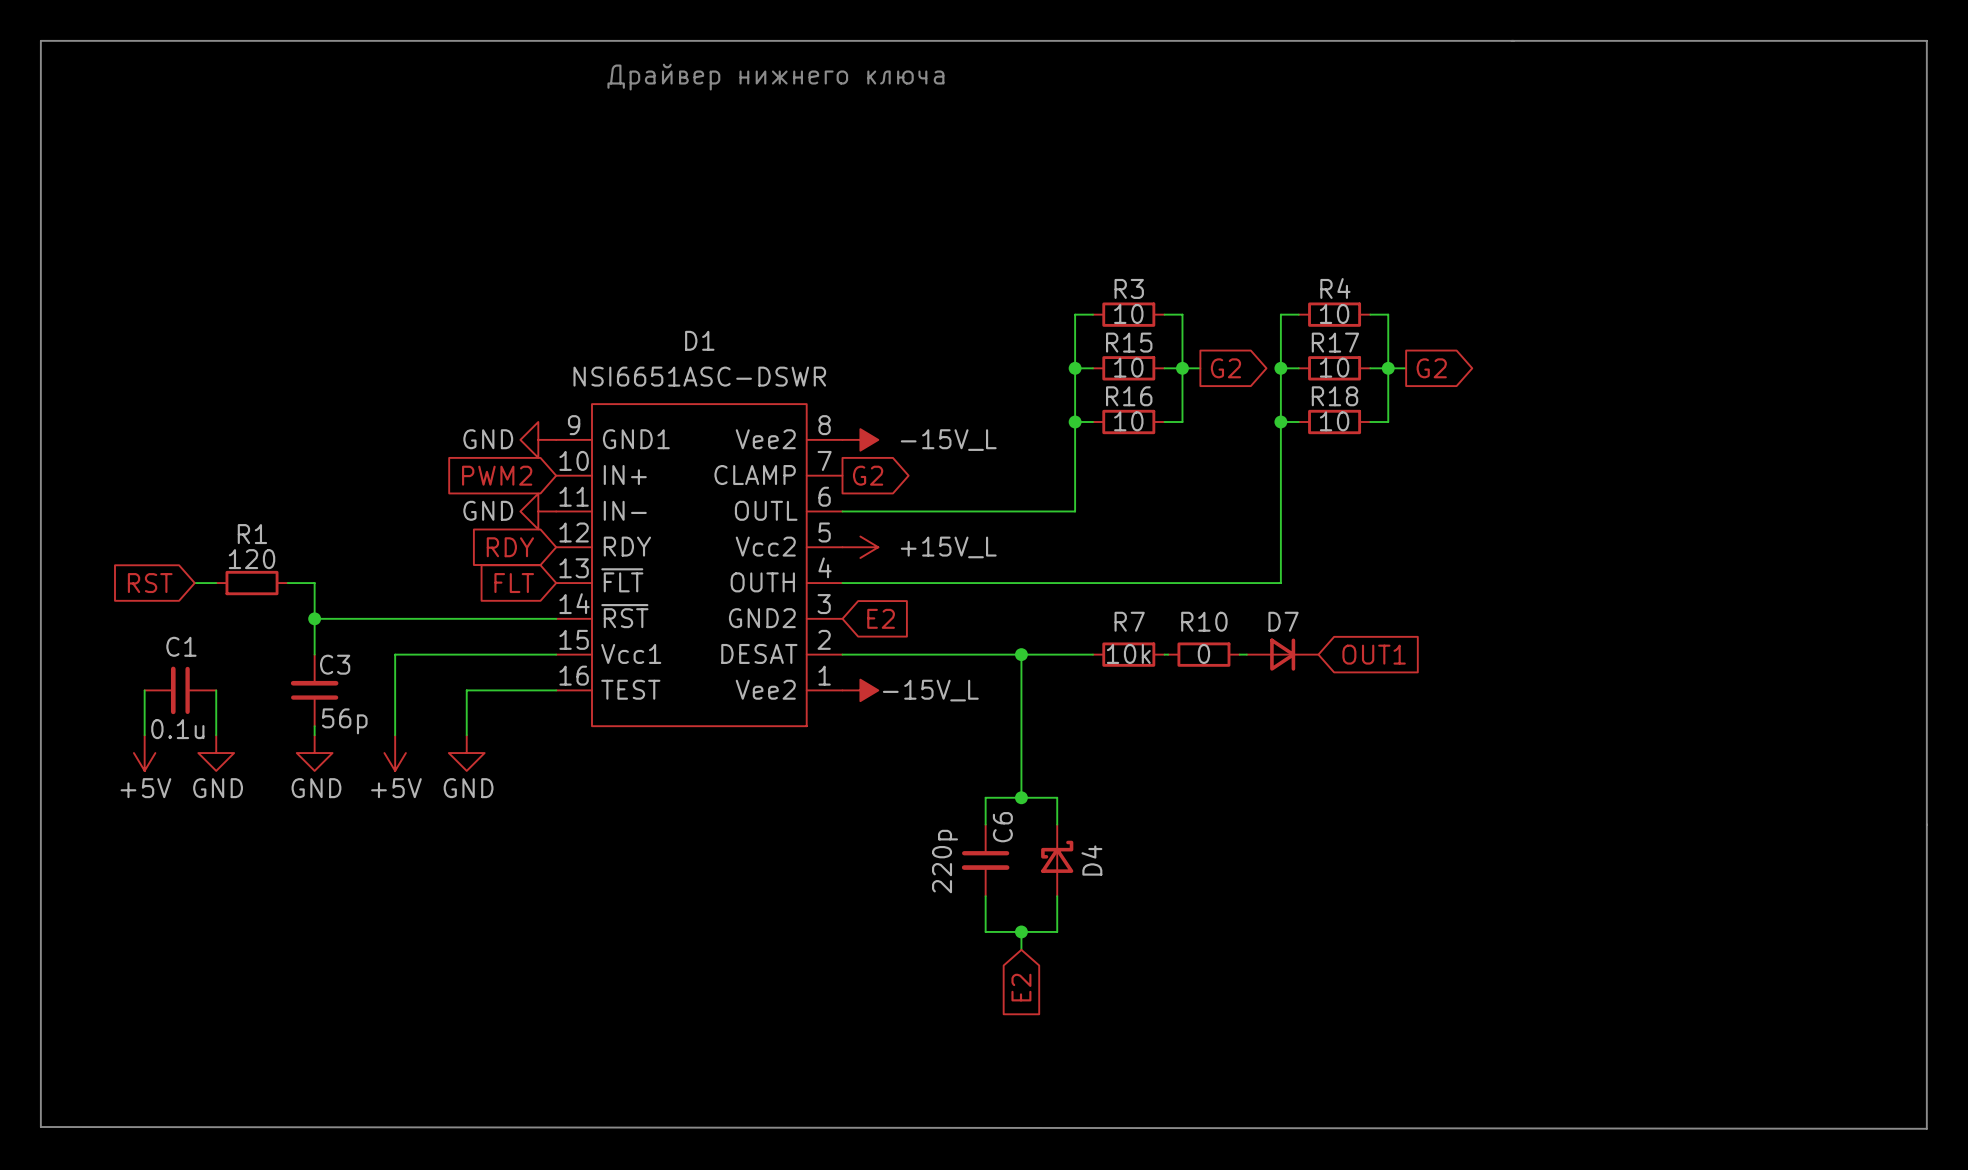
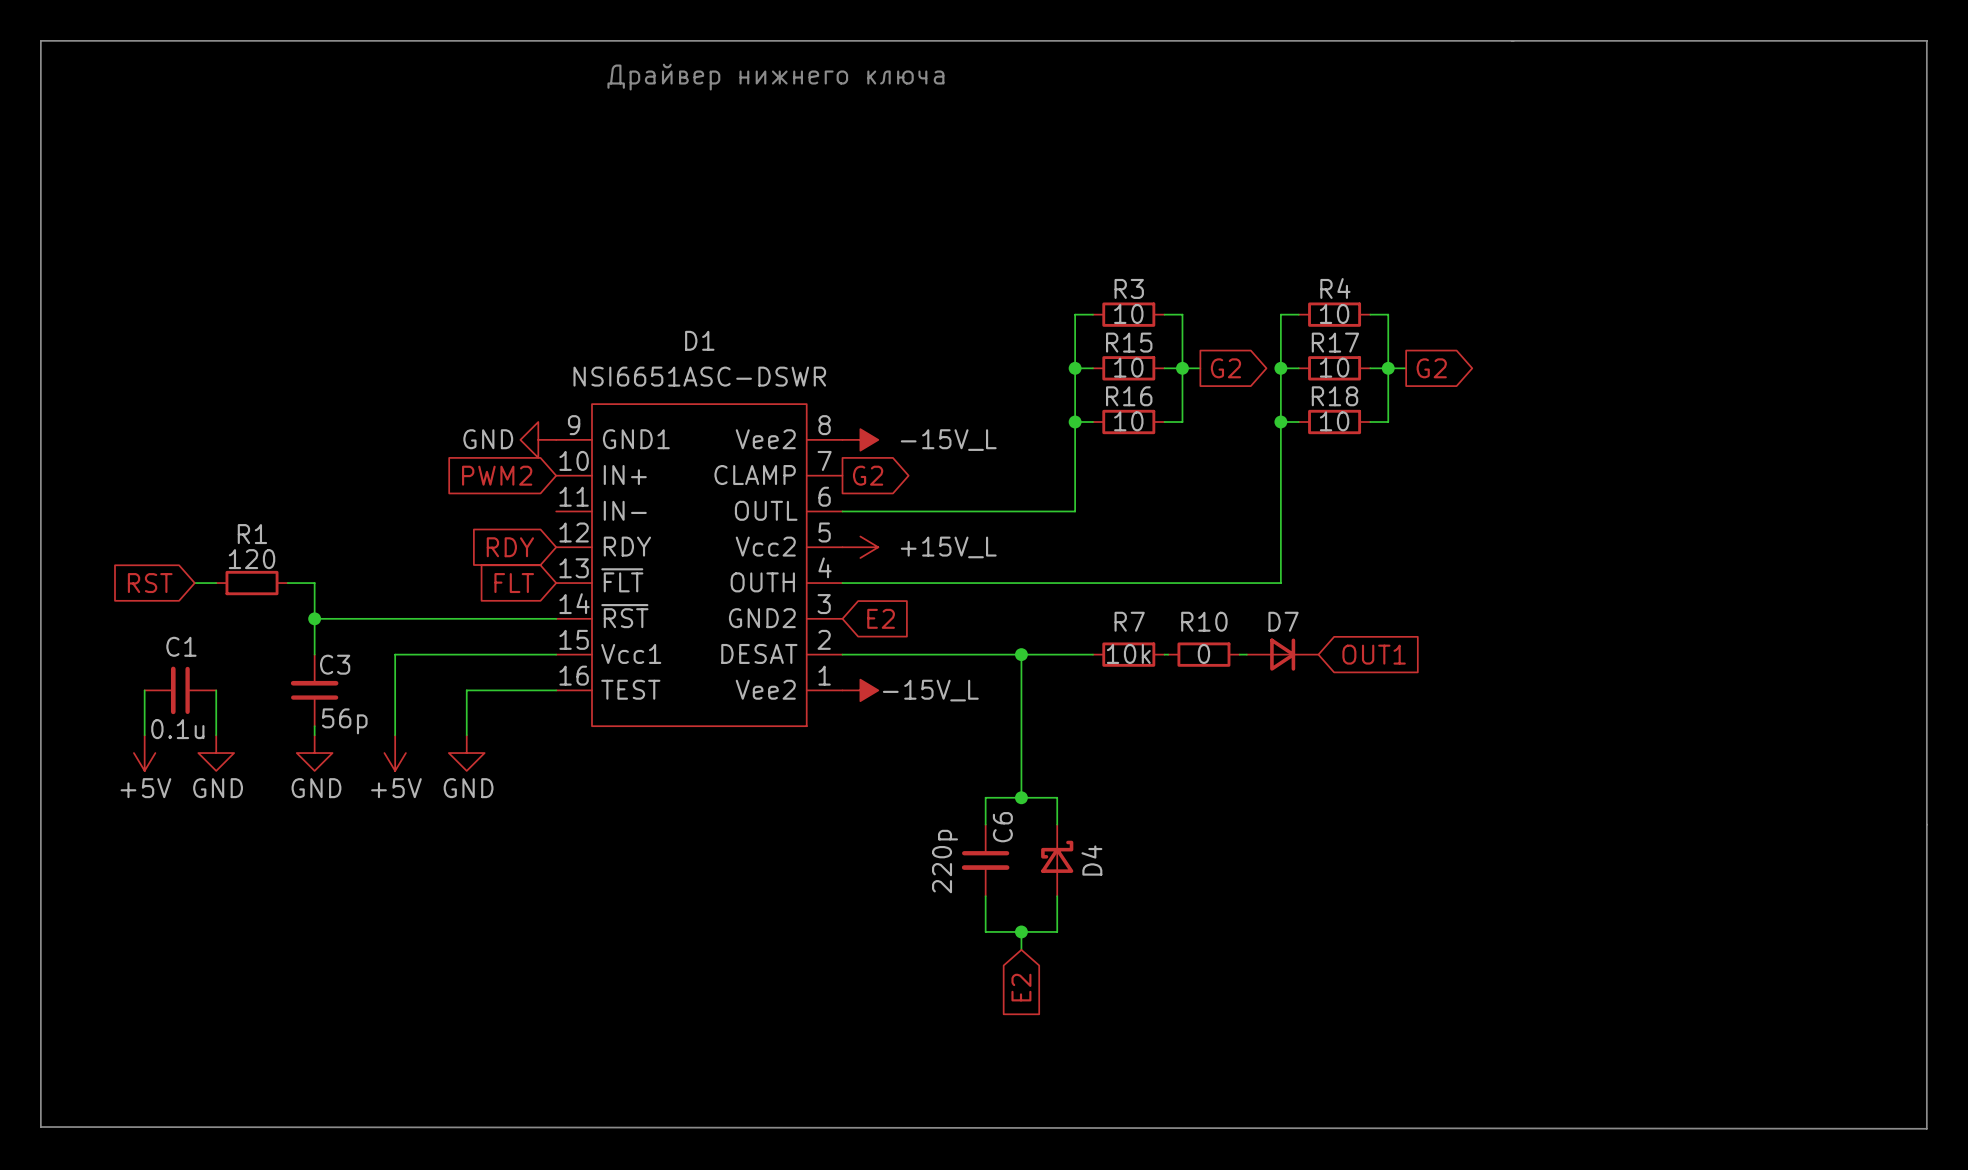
power symbol: GND (538, 511) -> none

